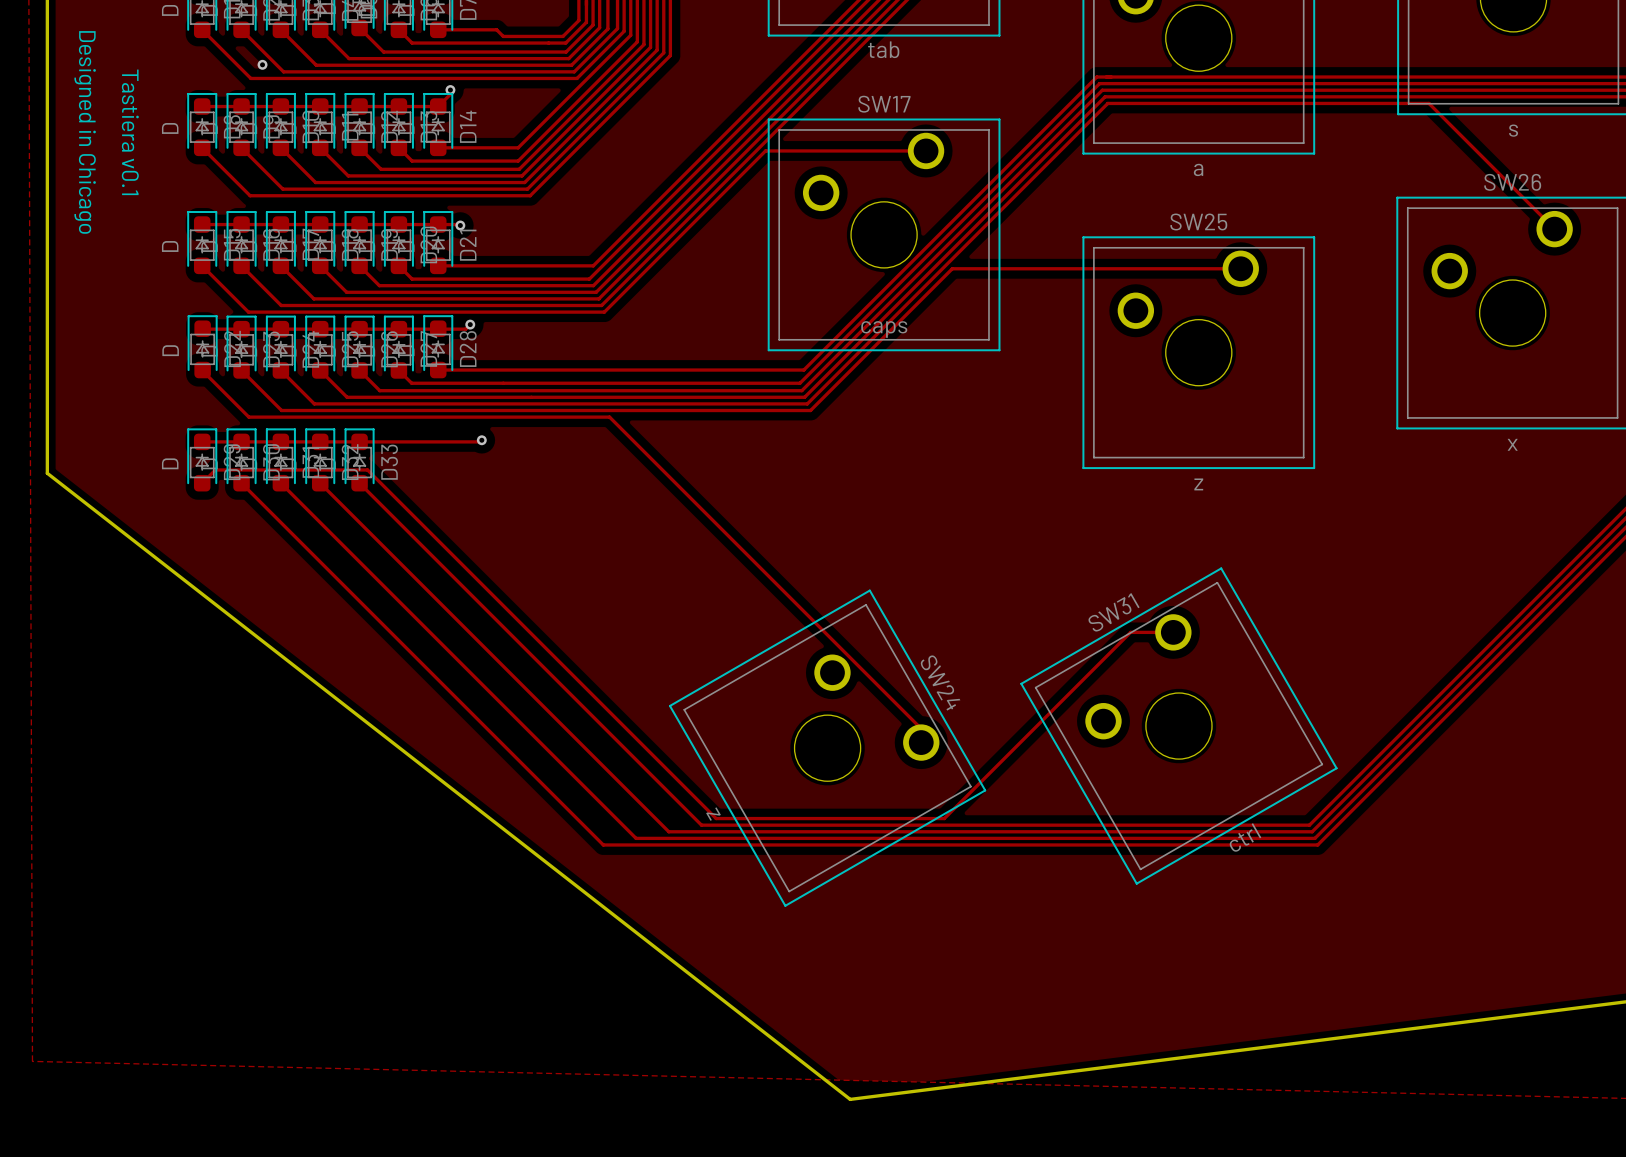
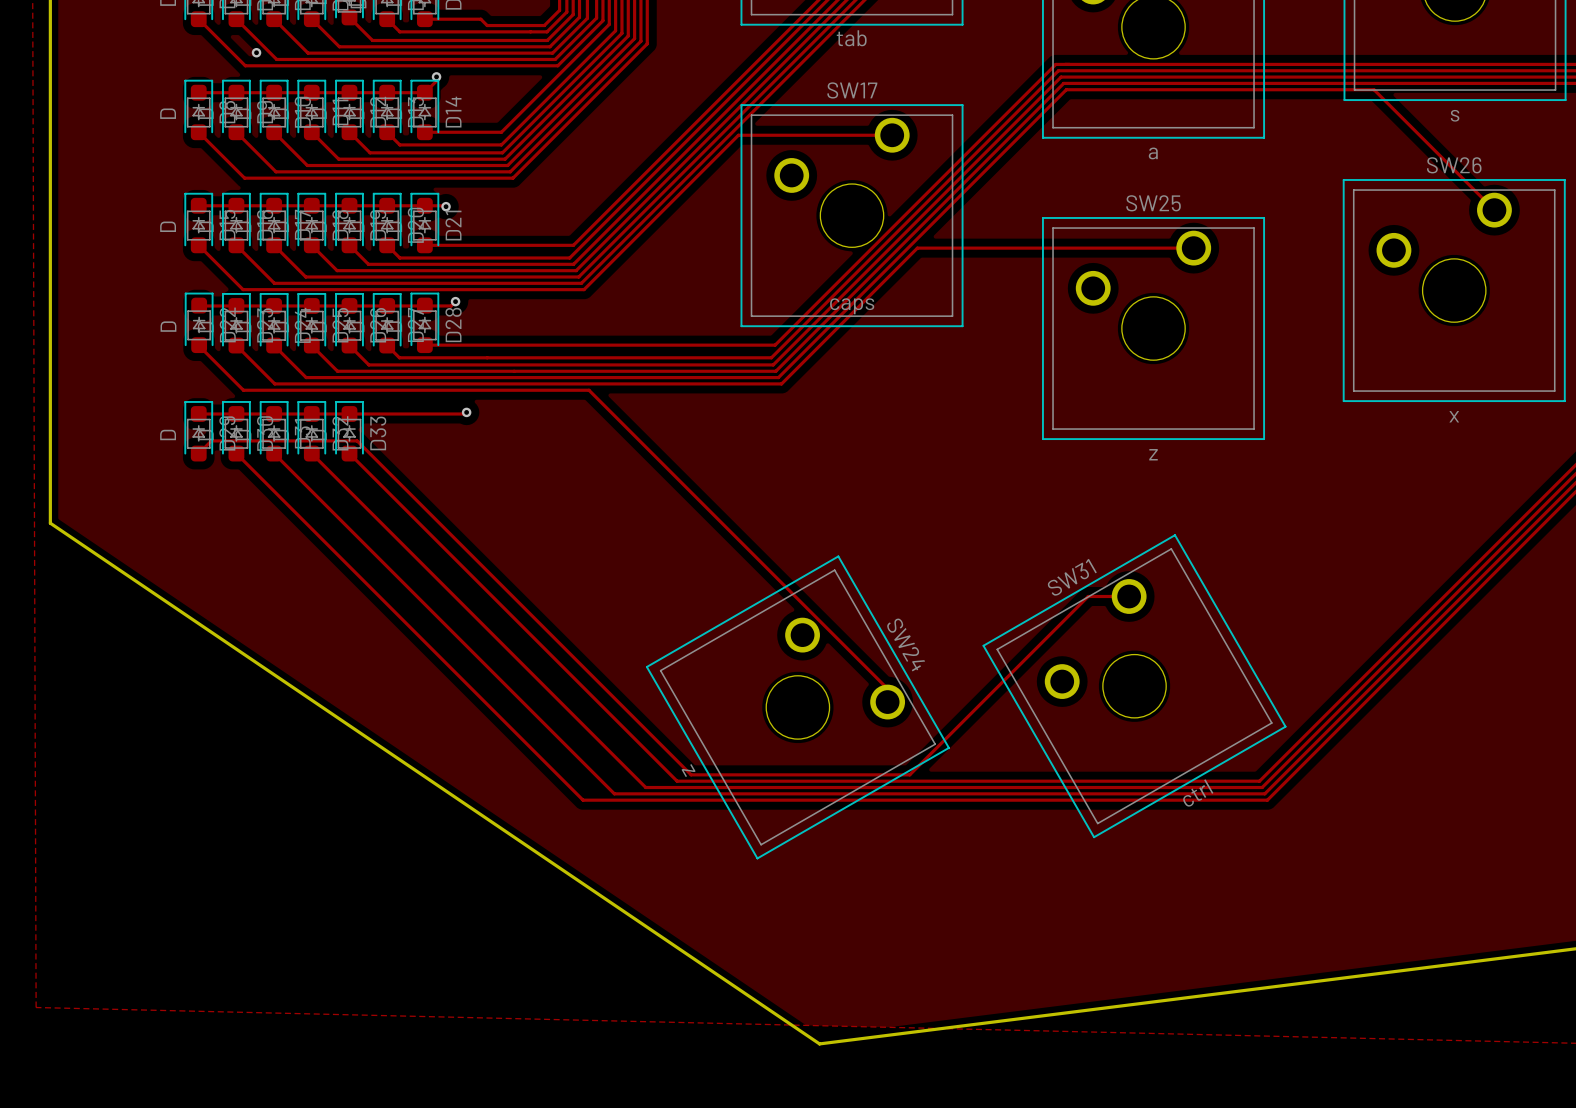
text: Designed in Chicago (85, 132) -> none
text: Tastiera v0.1 (130, 132) -> none
board edge: (47, 473) (850, 1099) -> (50, 444) (50, 523) (819, 1043)

